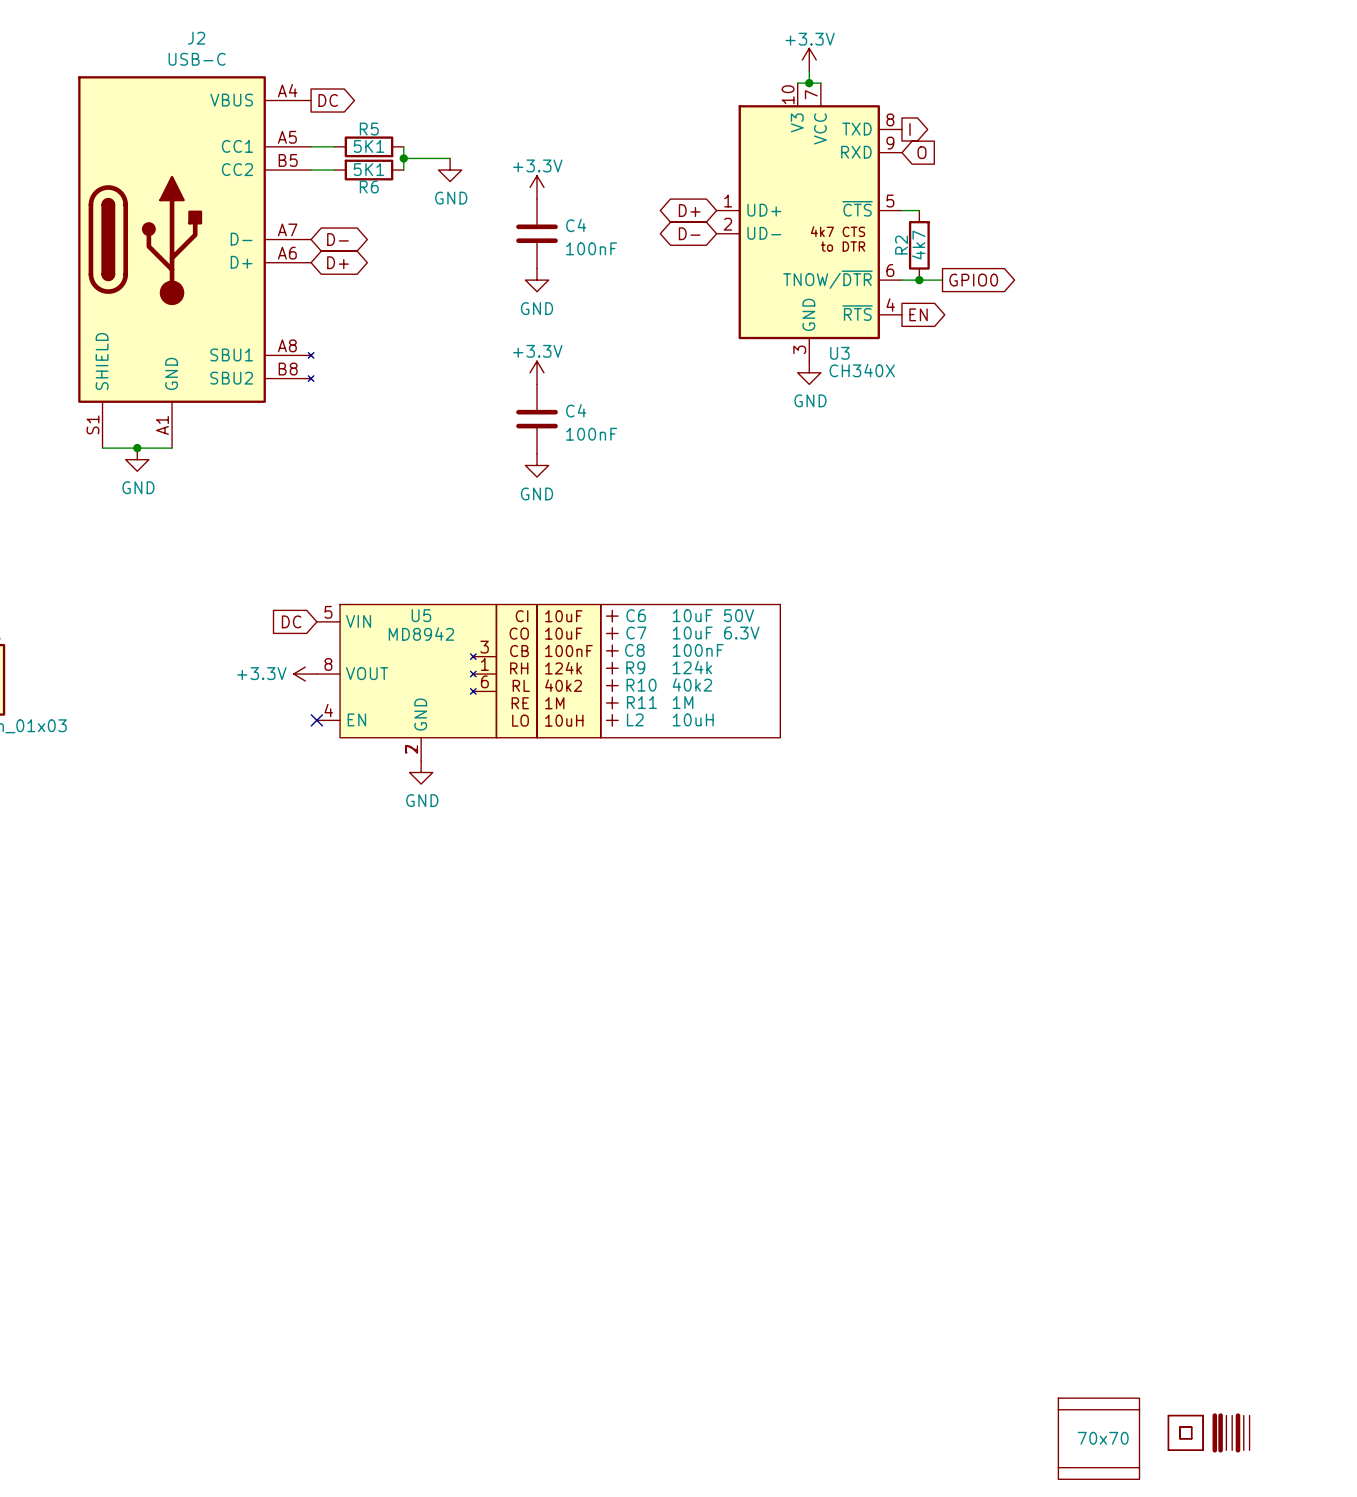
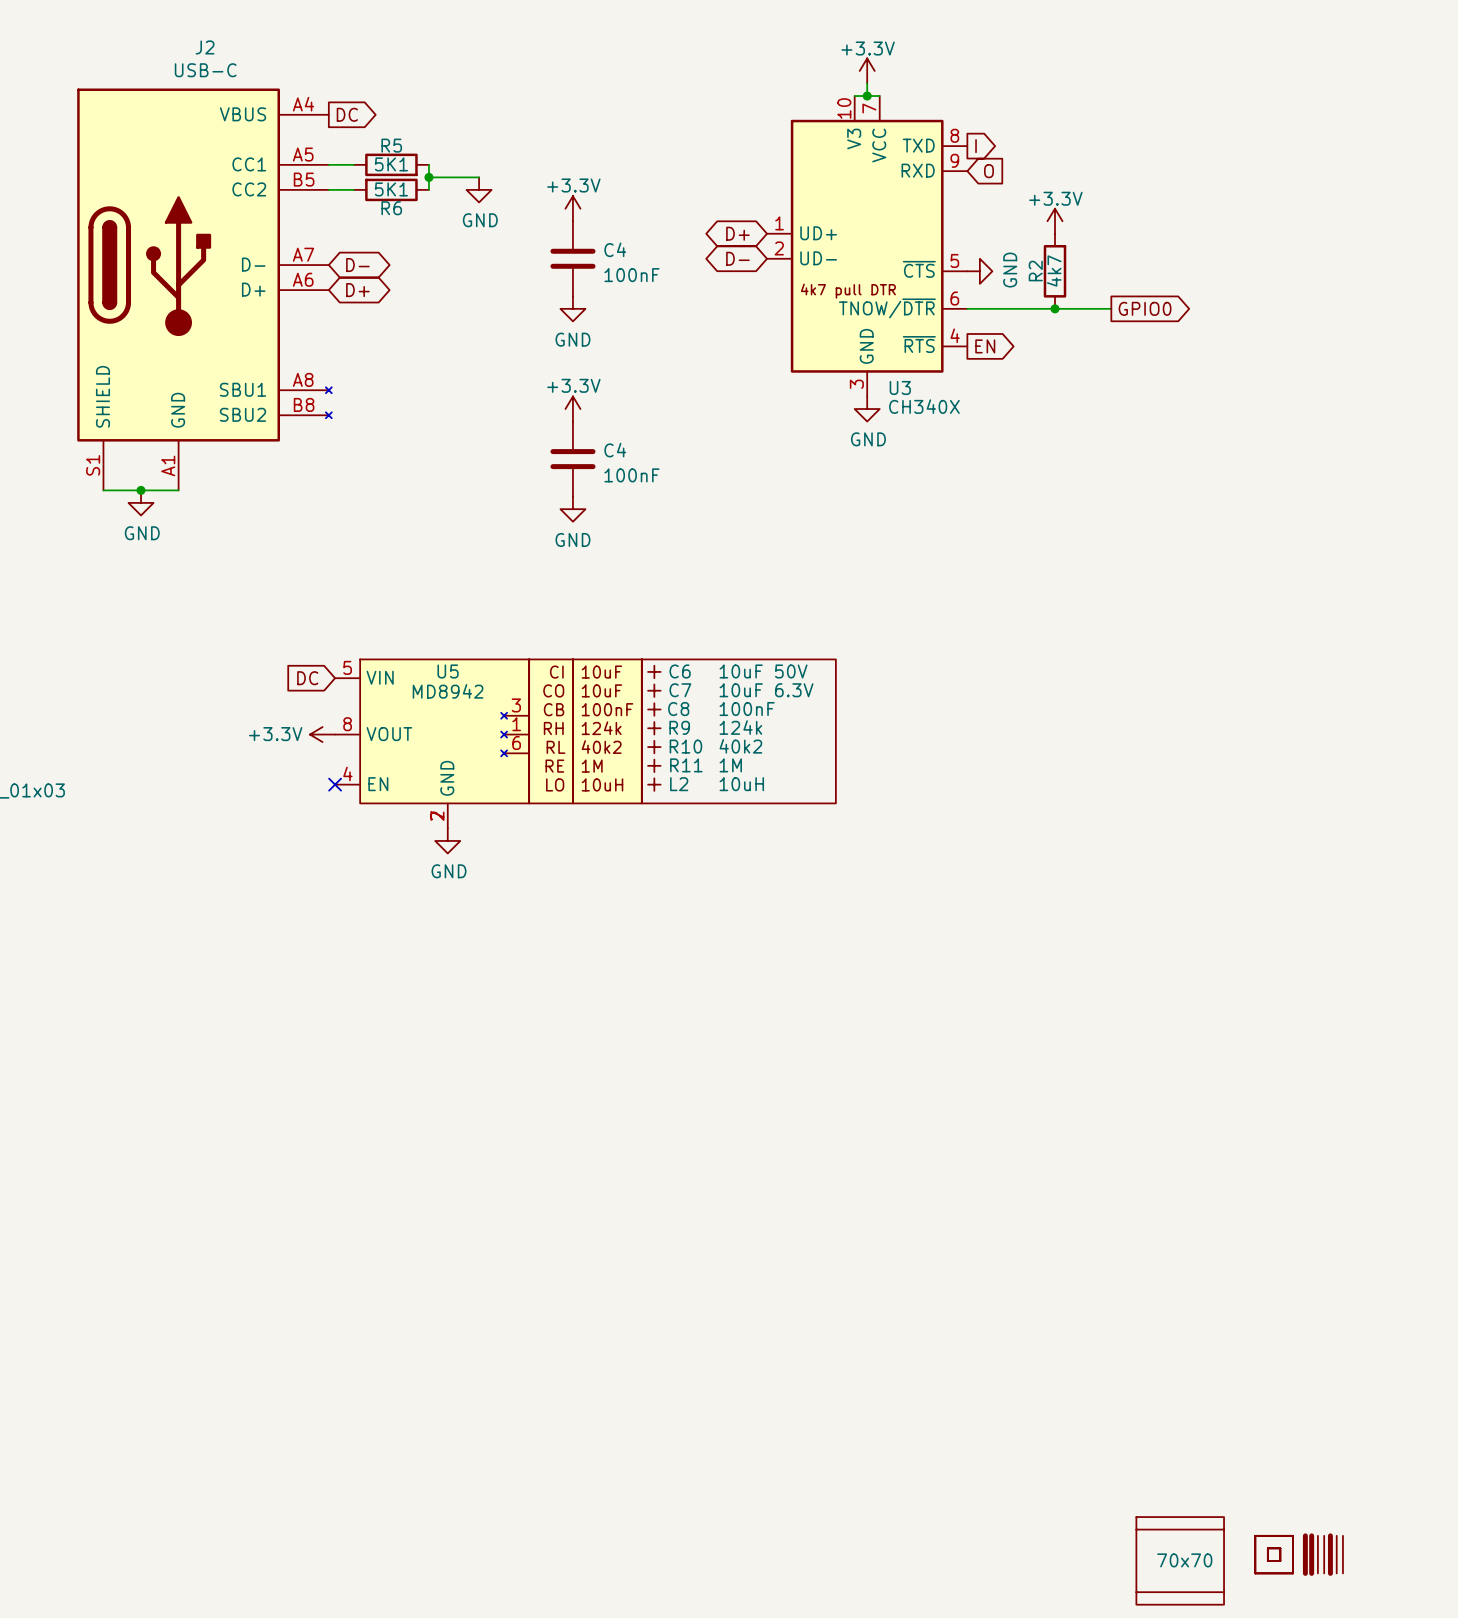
U3 symbol: [716, 83, 902, 362] -> [767, 96, 968, 397]
power symbol: none -> +3.3V (1055, 221)
wire: (901, 210) (919, 210) -> none
power symbol: none -> GND (979, 271)
R2 position: (919, 245) -> (1055, 271)
junction: (919, 280) -> none
wire: none -> (1011, 308) (1111, 308)
global label position: GPIO0 (973, 280) -> GPIO0 (1145, 308)
junction: none -> (1055, 308)

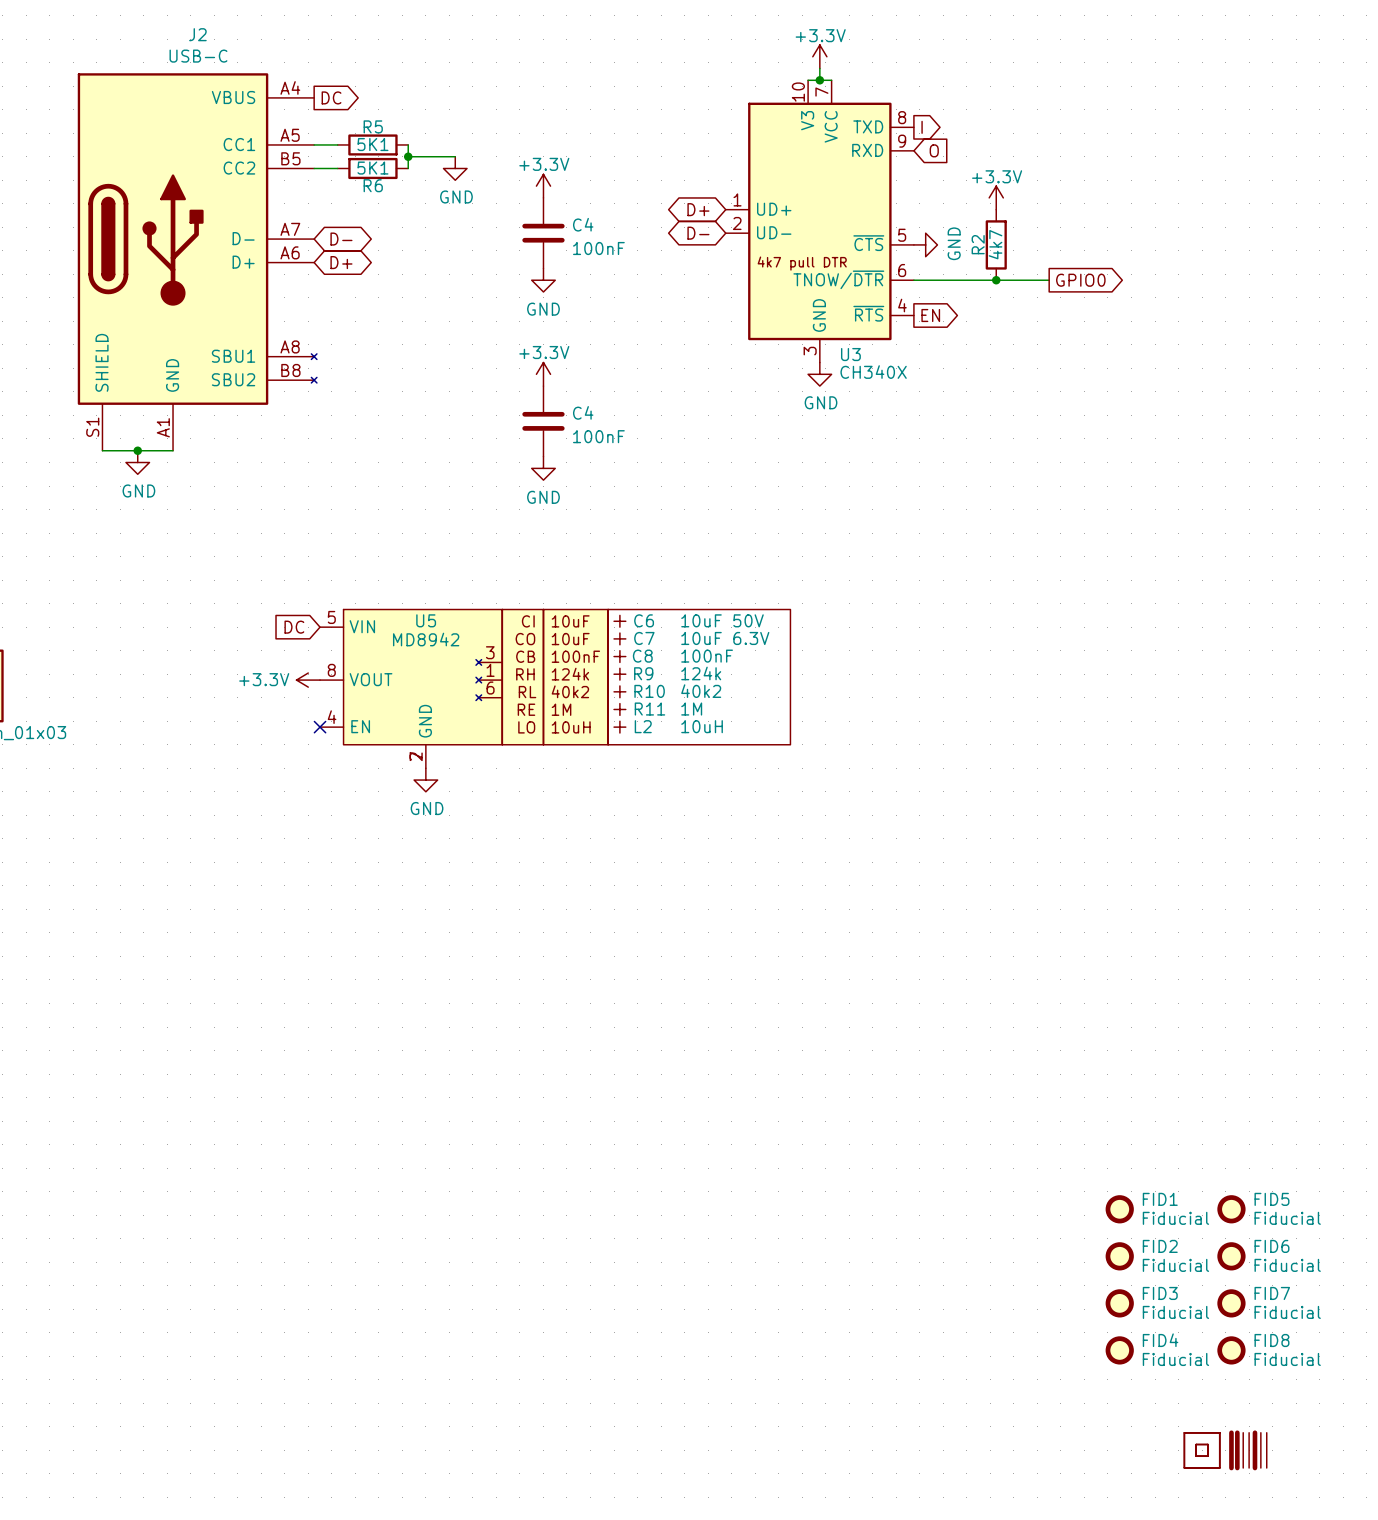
FID1: none -> Fiducial (1119, 1209)
FID5: none -> Fiducial (1231, 1209)
FID2: none -> Fiducial (1119, 1256)
FID6: none -> Fiducial (1231, 1256)
FID3: none -> Fiducial (1119, 1303)
FID7: none -> Fiducial (1231, 1303)
FID4: none -> Fiducial (1119, 1350)
FID8: none -> Fiducial (1231, 1350)
part: 70x70 (1180, 1560) -> none

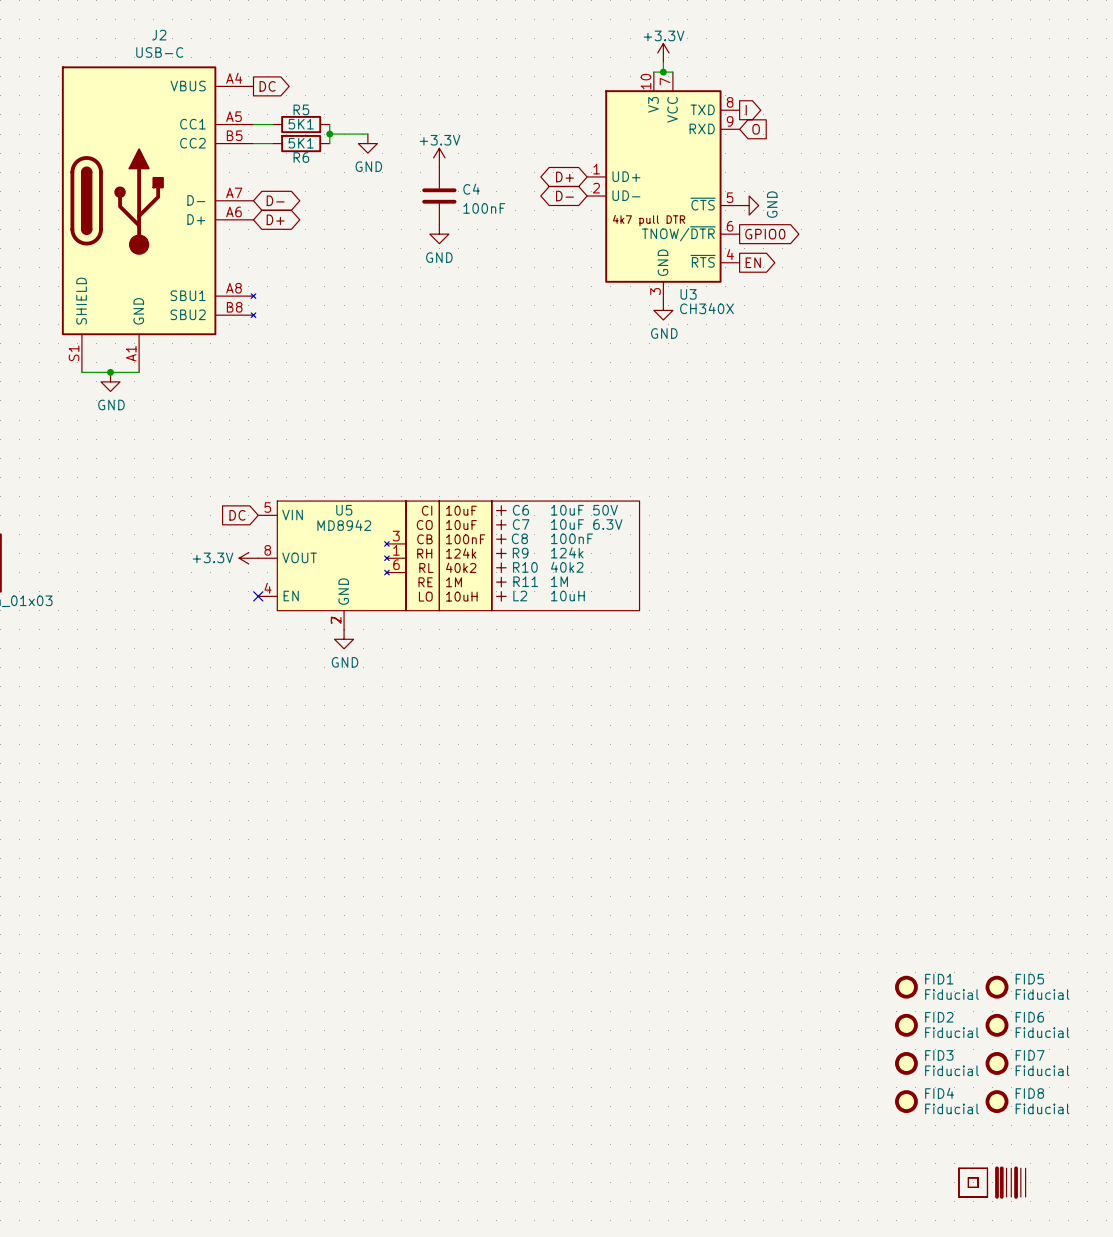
power symbol: +3.3V (996, 197) -> none
R2: 4k7 (996, 244) -> none
wire: (913, 280) (1049, 280) -> none
junction: (996, 280) -> none
global label position: GPIO0 (1080, 280) -> GPIO0 (765, 234)
power symbol: +3.3V (543, 374) -> none
C4: 100nF (543, 421) -> none
power symbol: GND (543, 468) -> none

